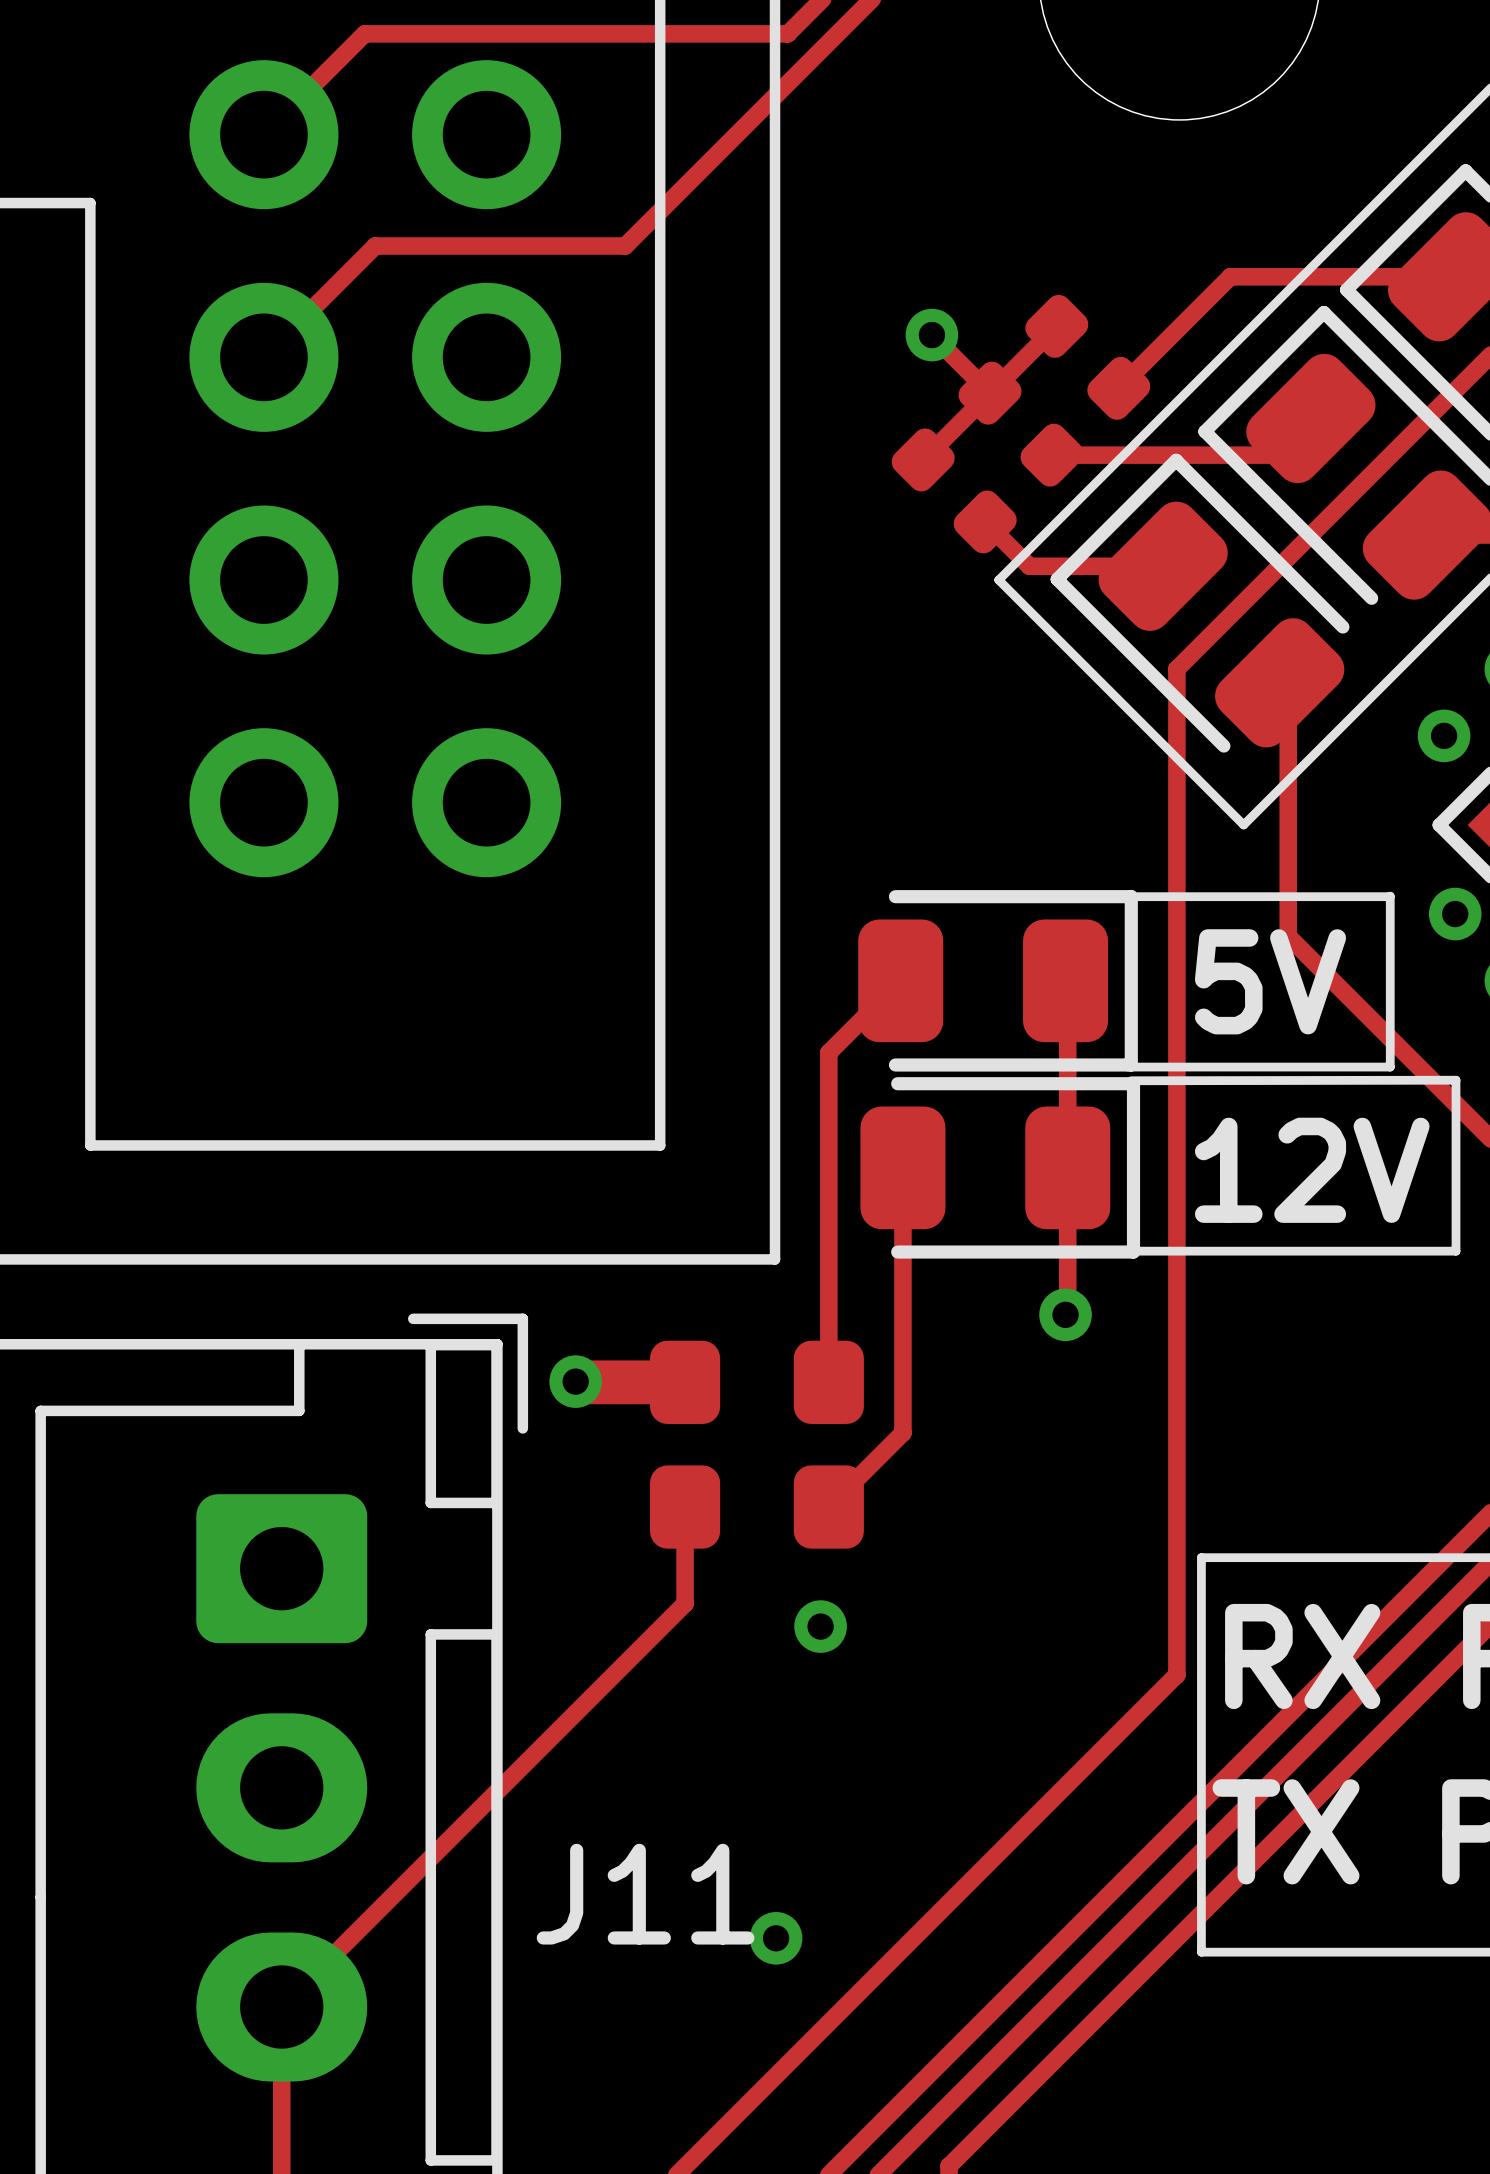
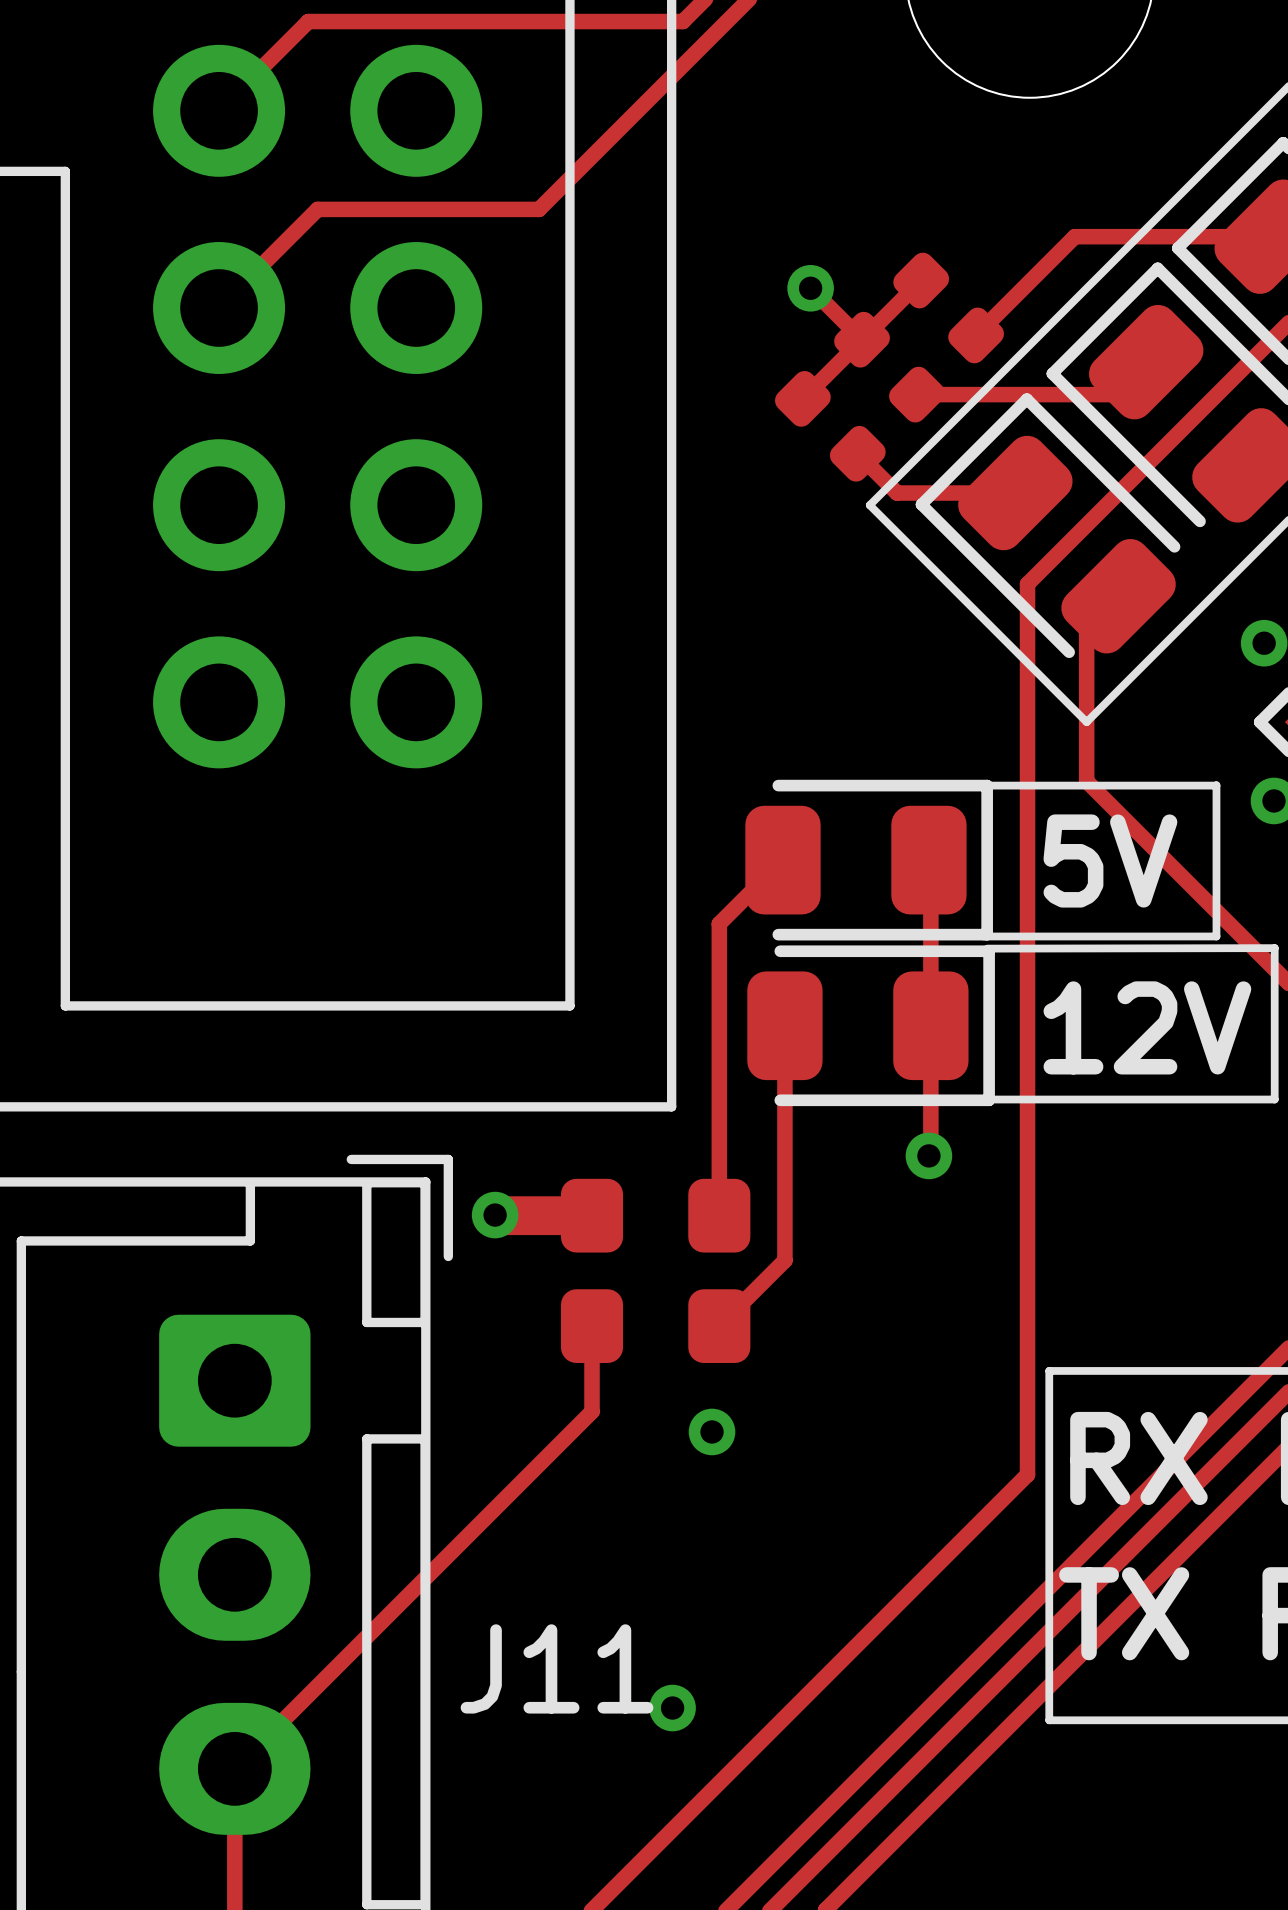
track: (1279, 682) (1288, 691) (1288, 936) -> (1118, 596) (1086, 628) (1086, 781) (1126, 820)

